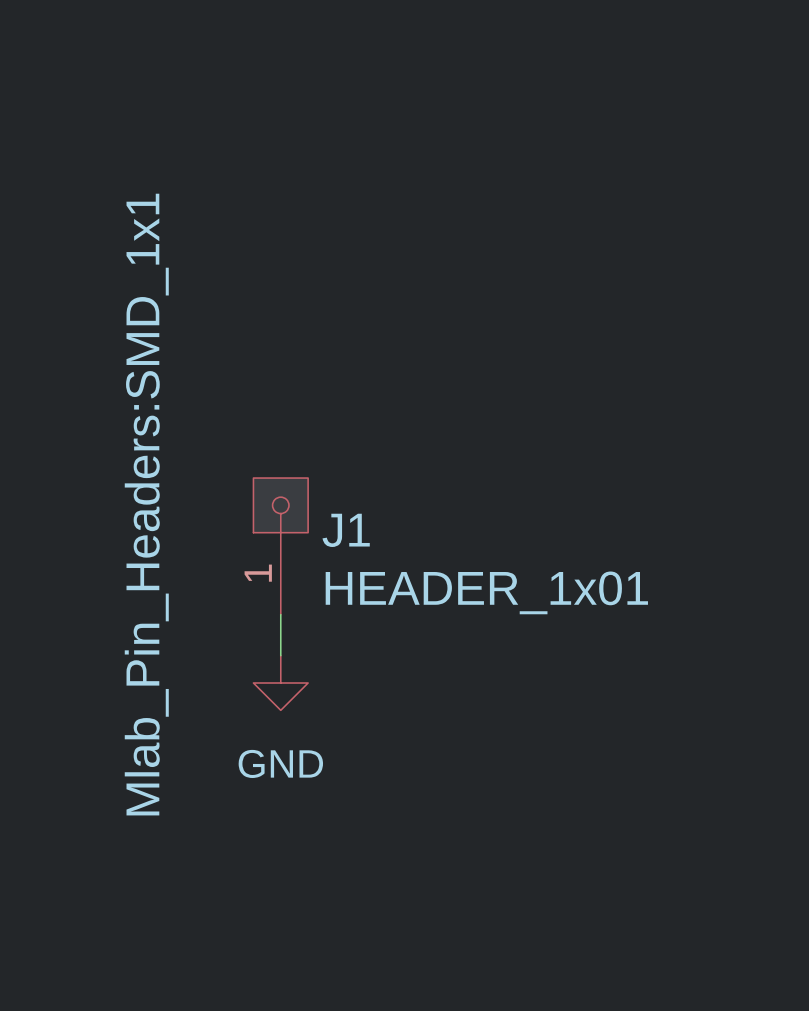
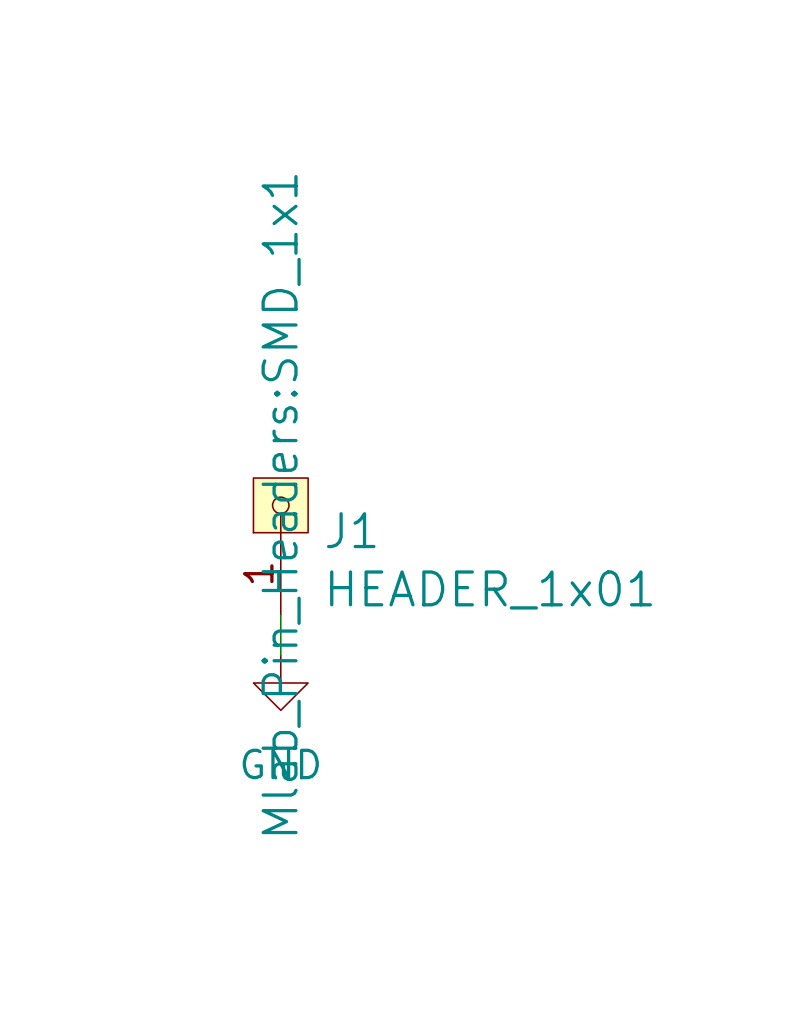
J1 text position: Mlab_Pin_Headers:SMD_1x1 (146, 504) -> Mlab_Pin_Headers:SMD_1x1 (281, 504)

